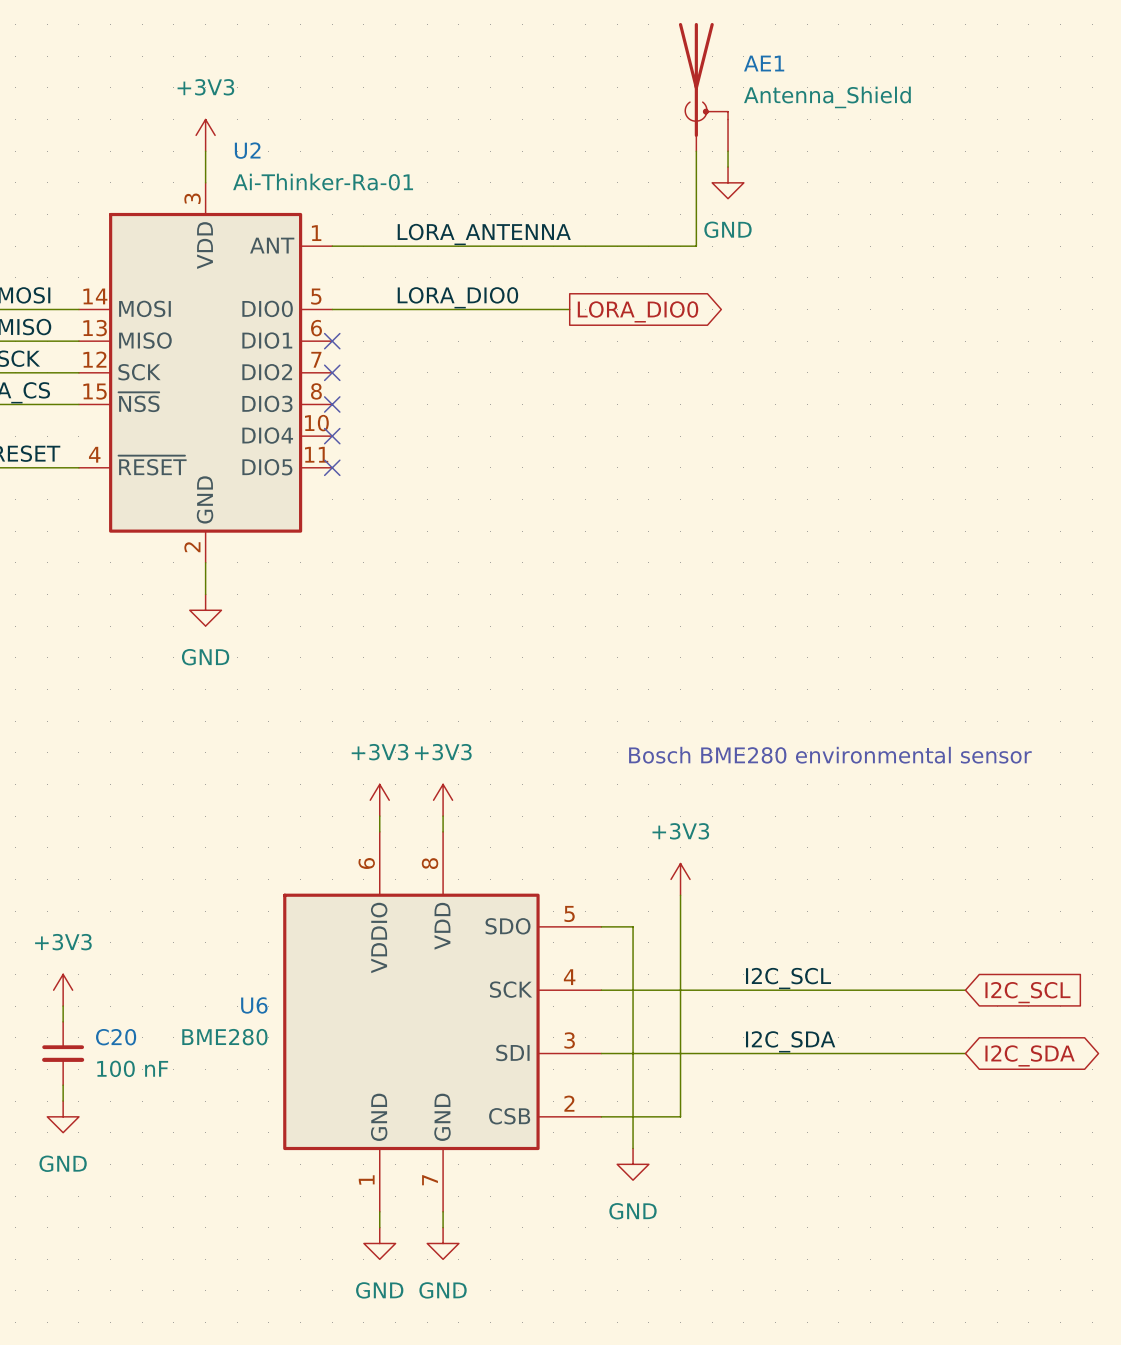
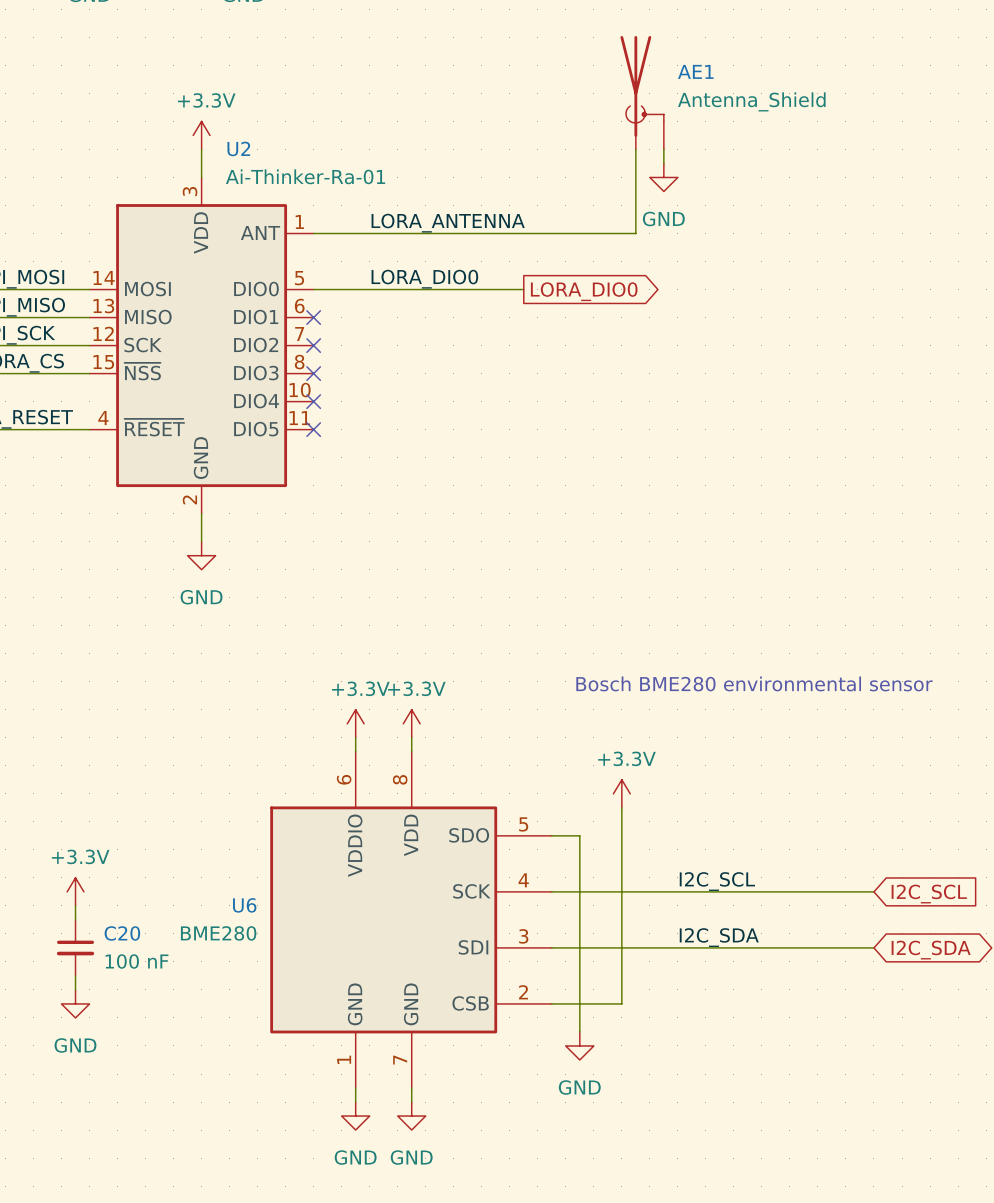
power symbol: +3V3 (205, 135) -> +3.3V (201, 135)
power symbol: +3V3 (379, 800) -> +3.3V (355, 723)
power symbol: +3V3 (443, 800) -> +3.3V (411, 723)
power symbol: +3V3 (680, 879) -> +3.3V (621, 793)
power symbol: +3V3 (63, 990) -> +3.3V (75, 891)

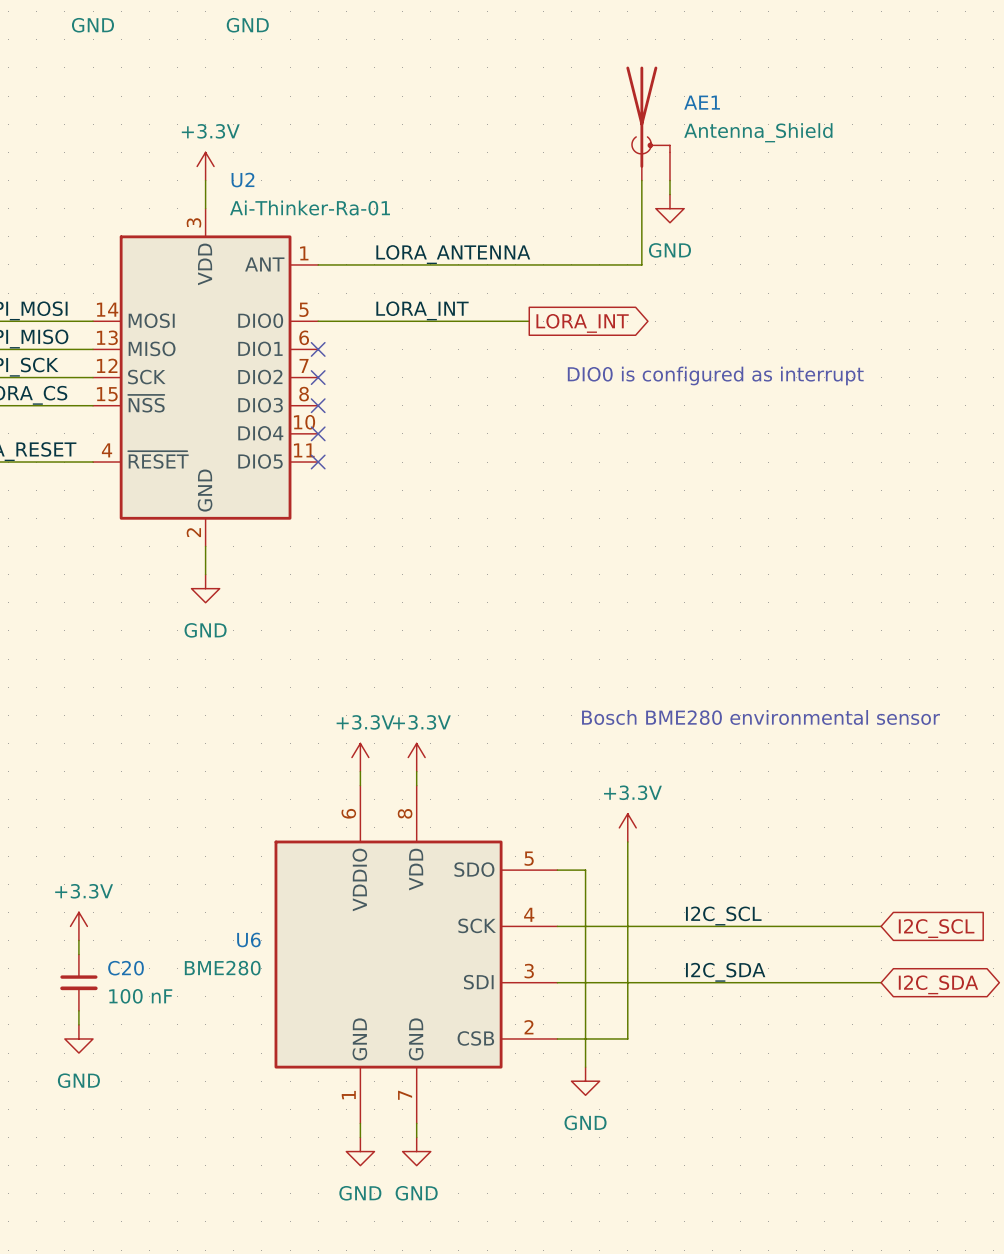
label: LORA_DIO0 (424, 279) -> LORA_INT (422, 310)
global label: LORA_DIO0 (584, 291) -> LORA_INT (582, 323)
text: none -> DIO0 is configured as interrupt (715, 375)

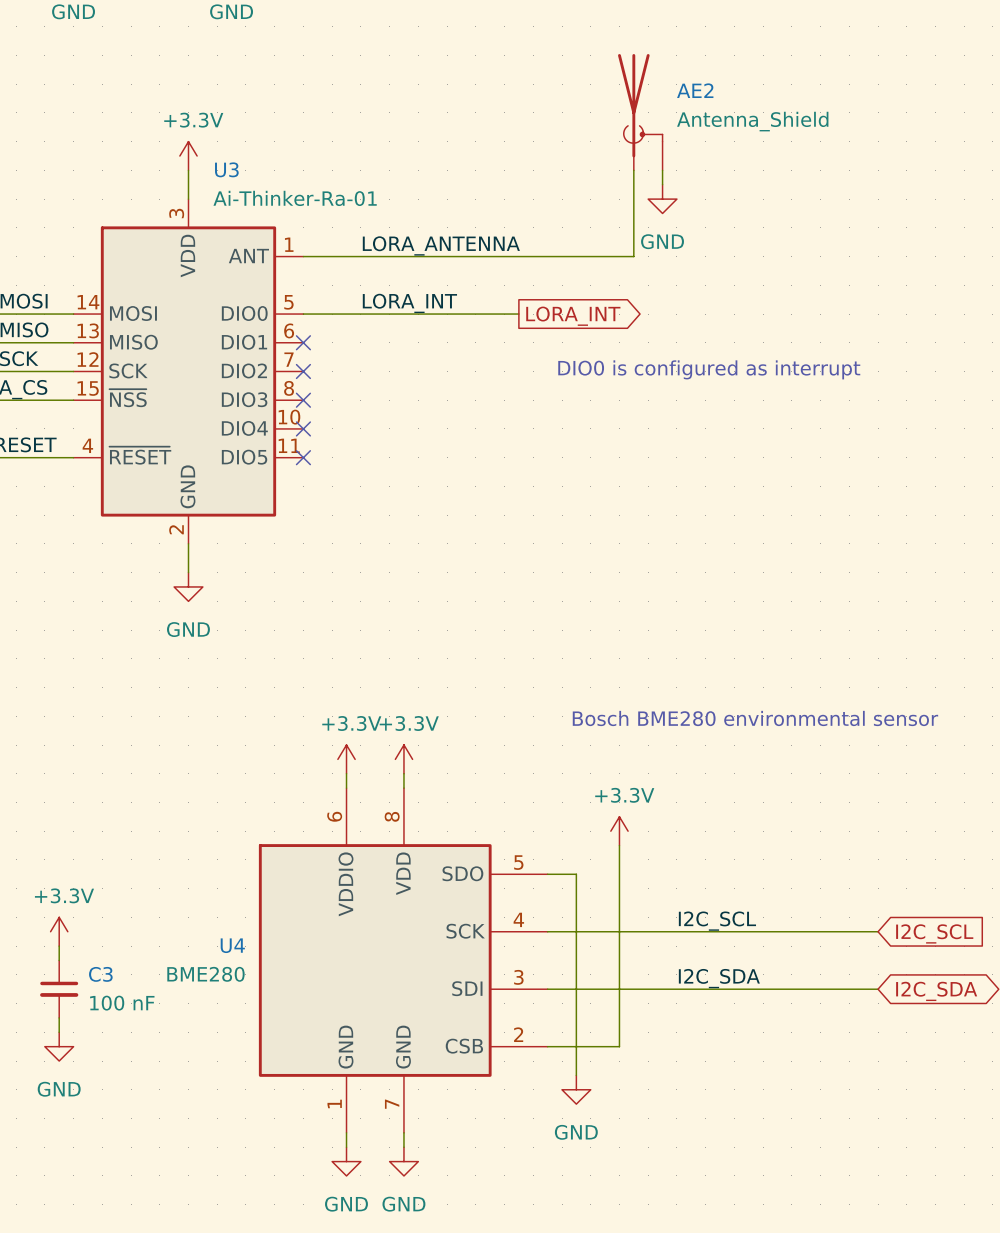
AE1 name: AE1 (702, 102) -> AE2 (695, 90)
U2 name: U2 (242, 180) -> U3 (226, 169)
U6 name: U6 (248, 939) -> U4 (232, 945)
C20 name: C20 (126, 968) -> C3 (100, 974)

